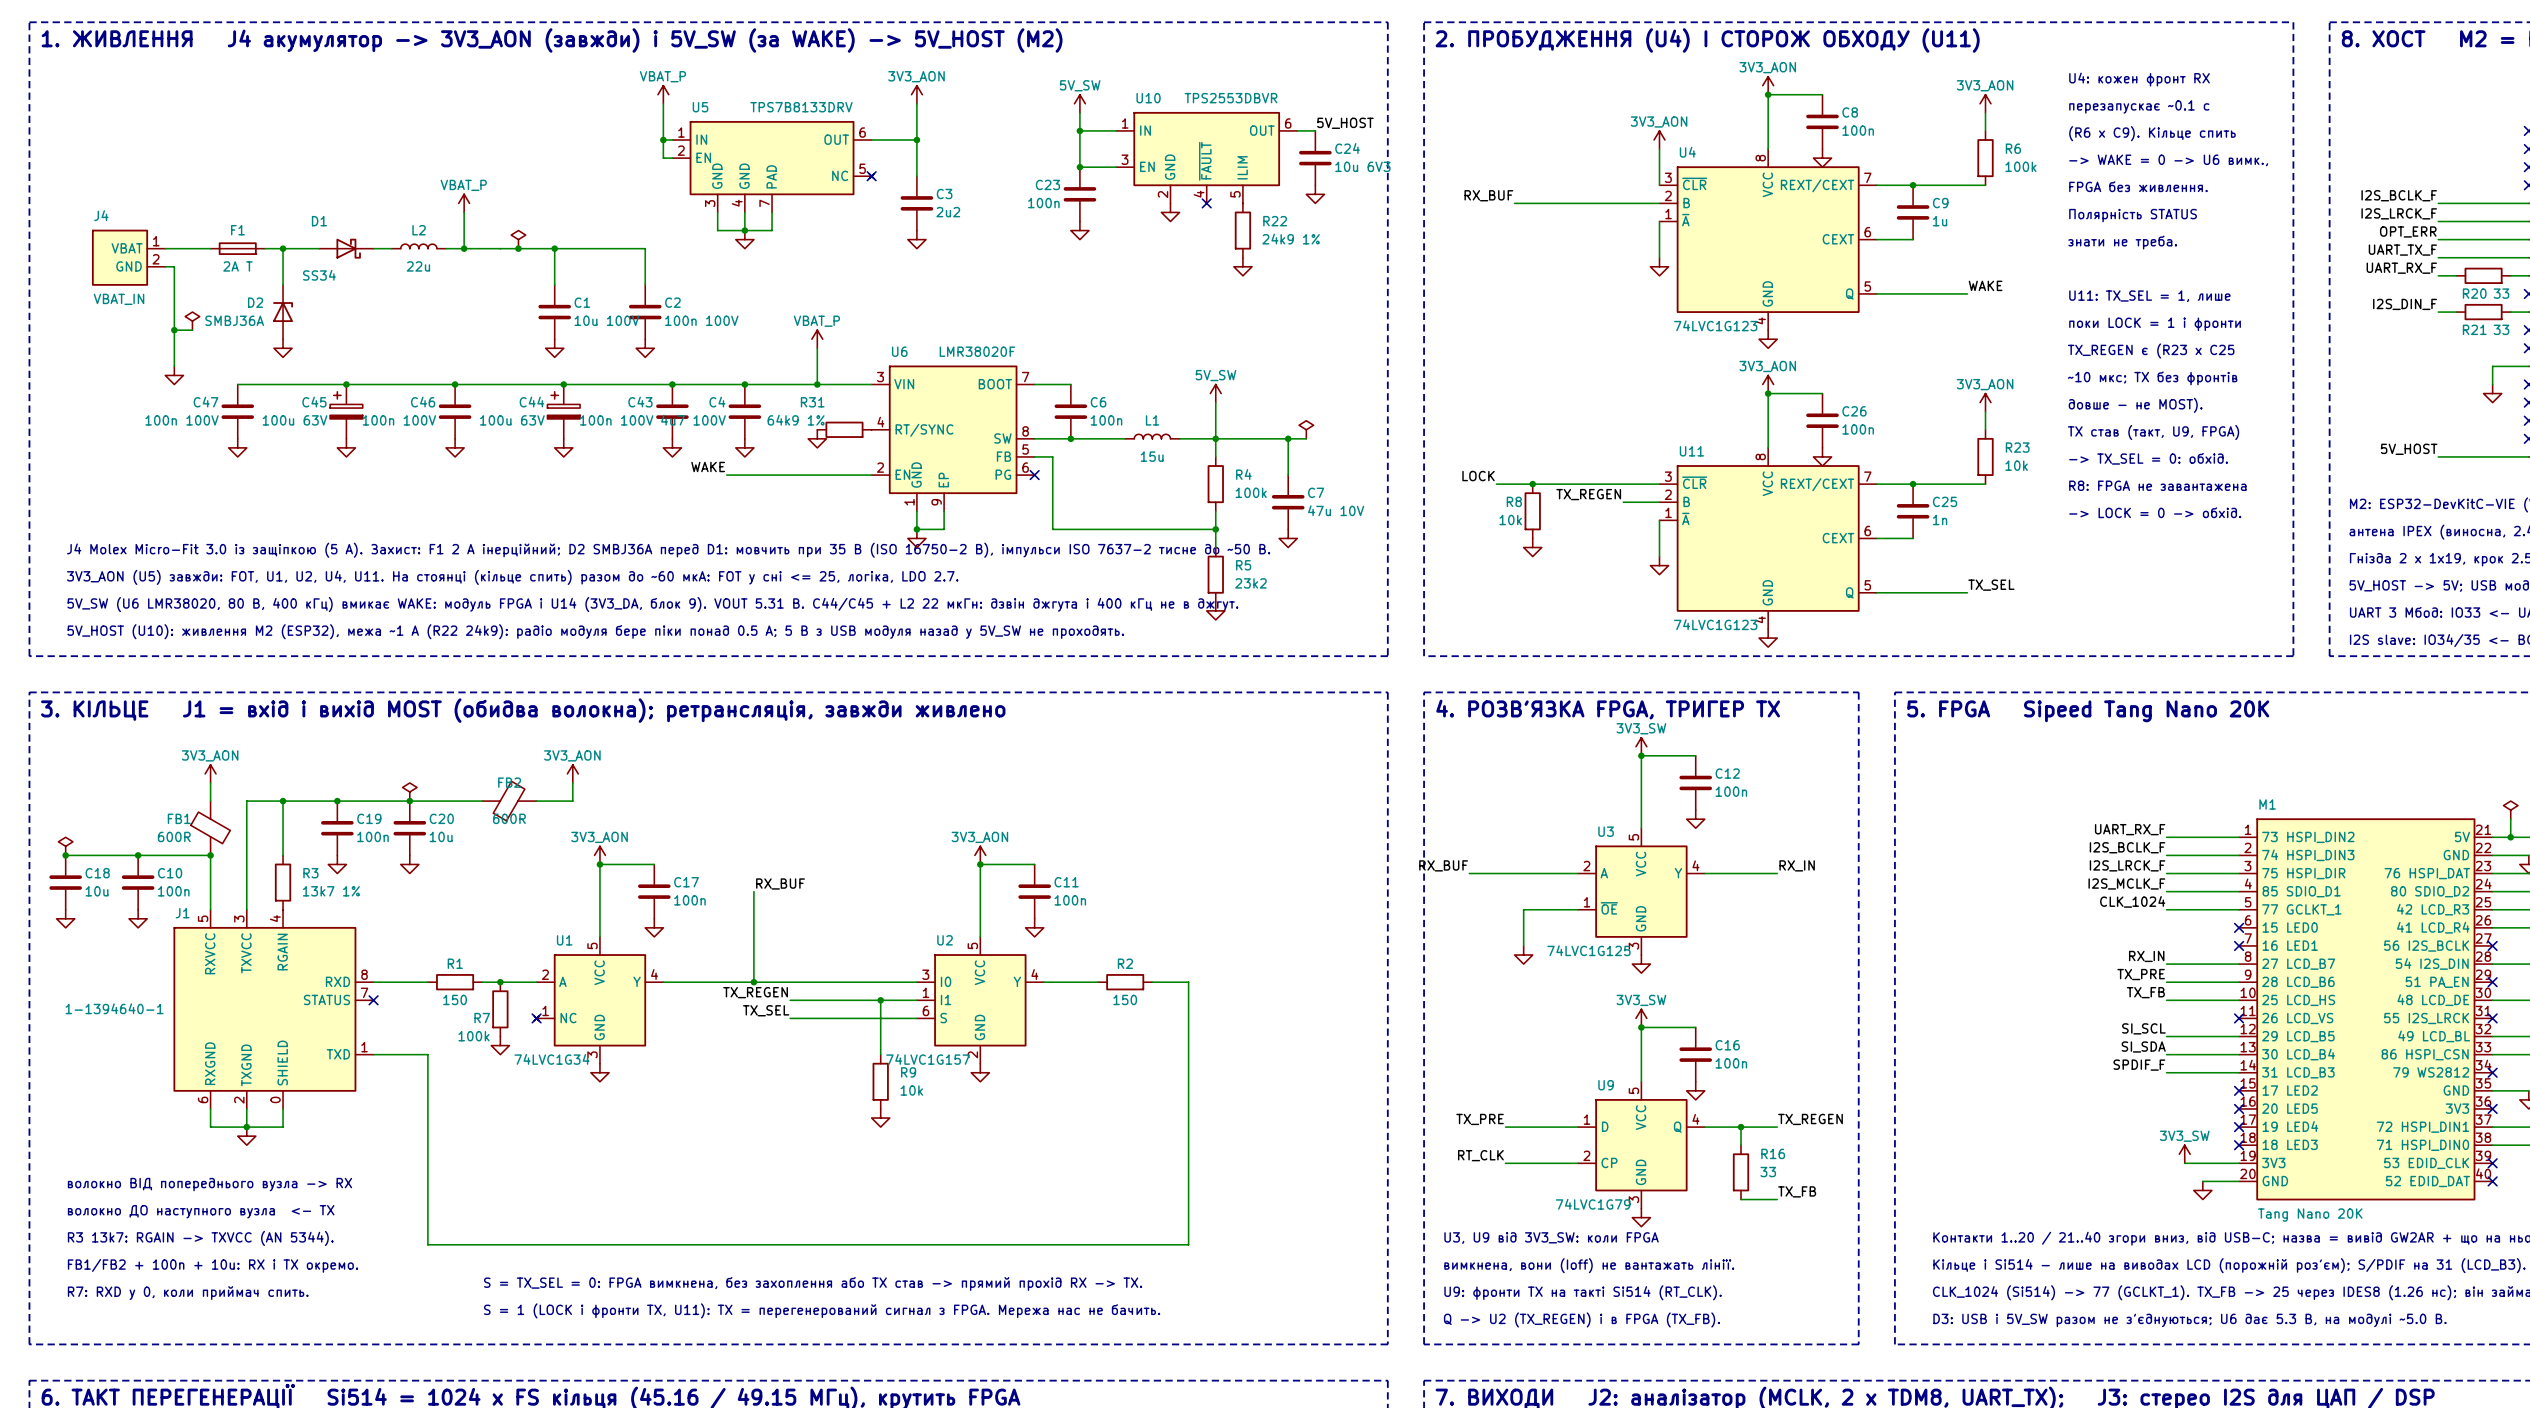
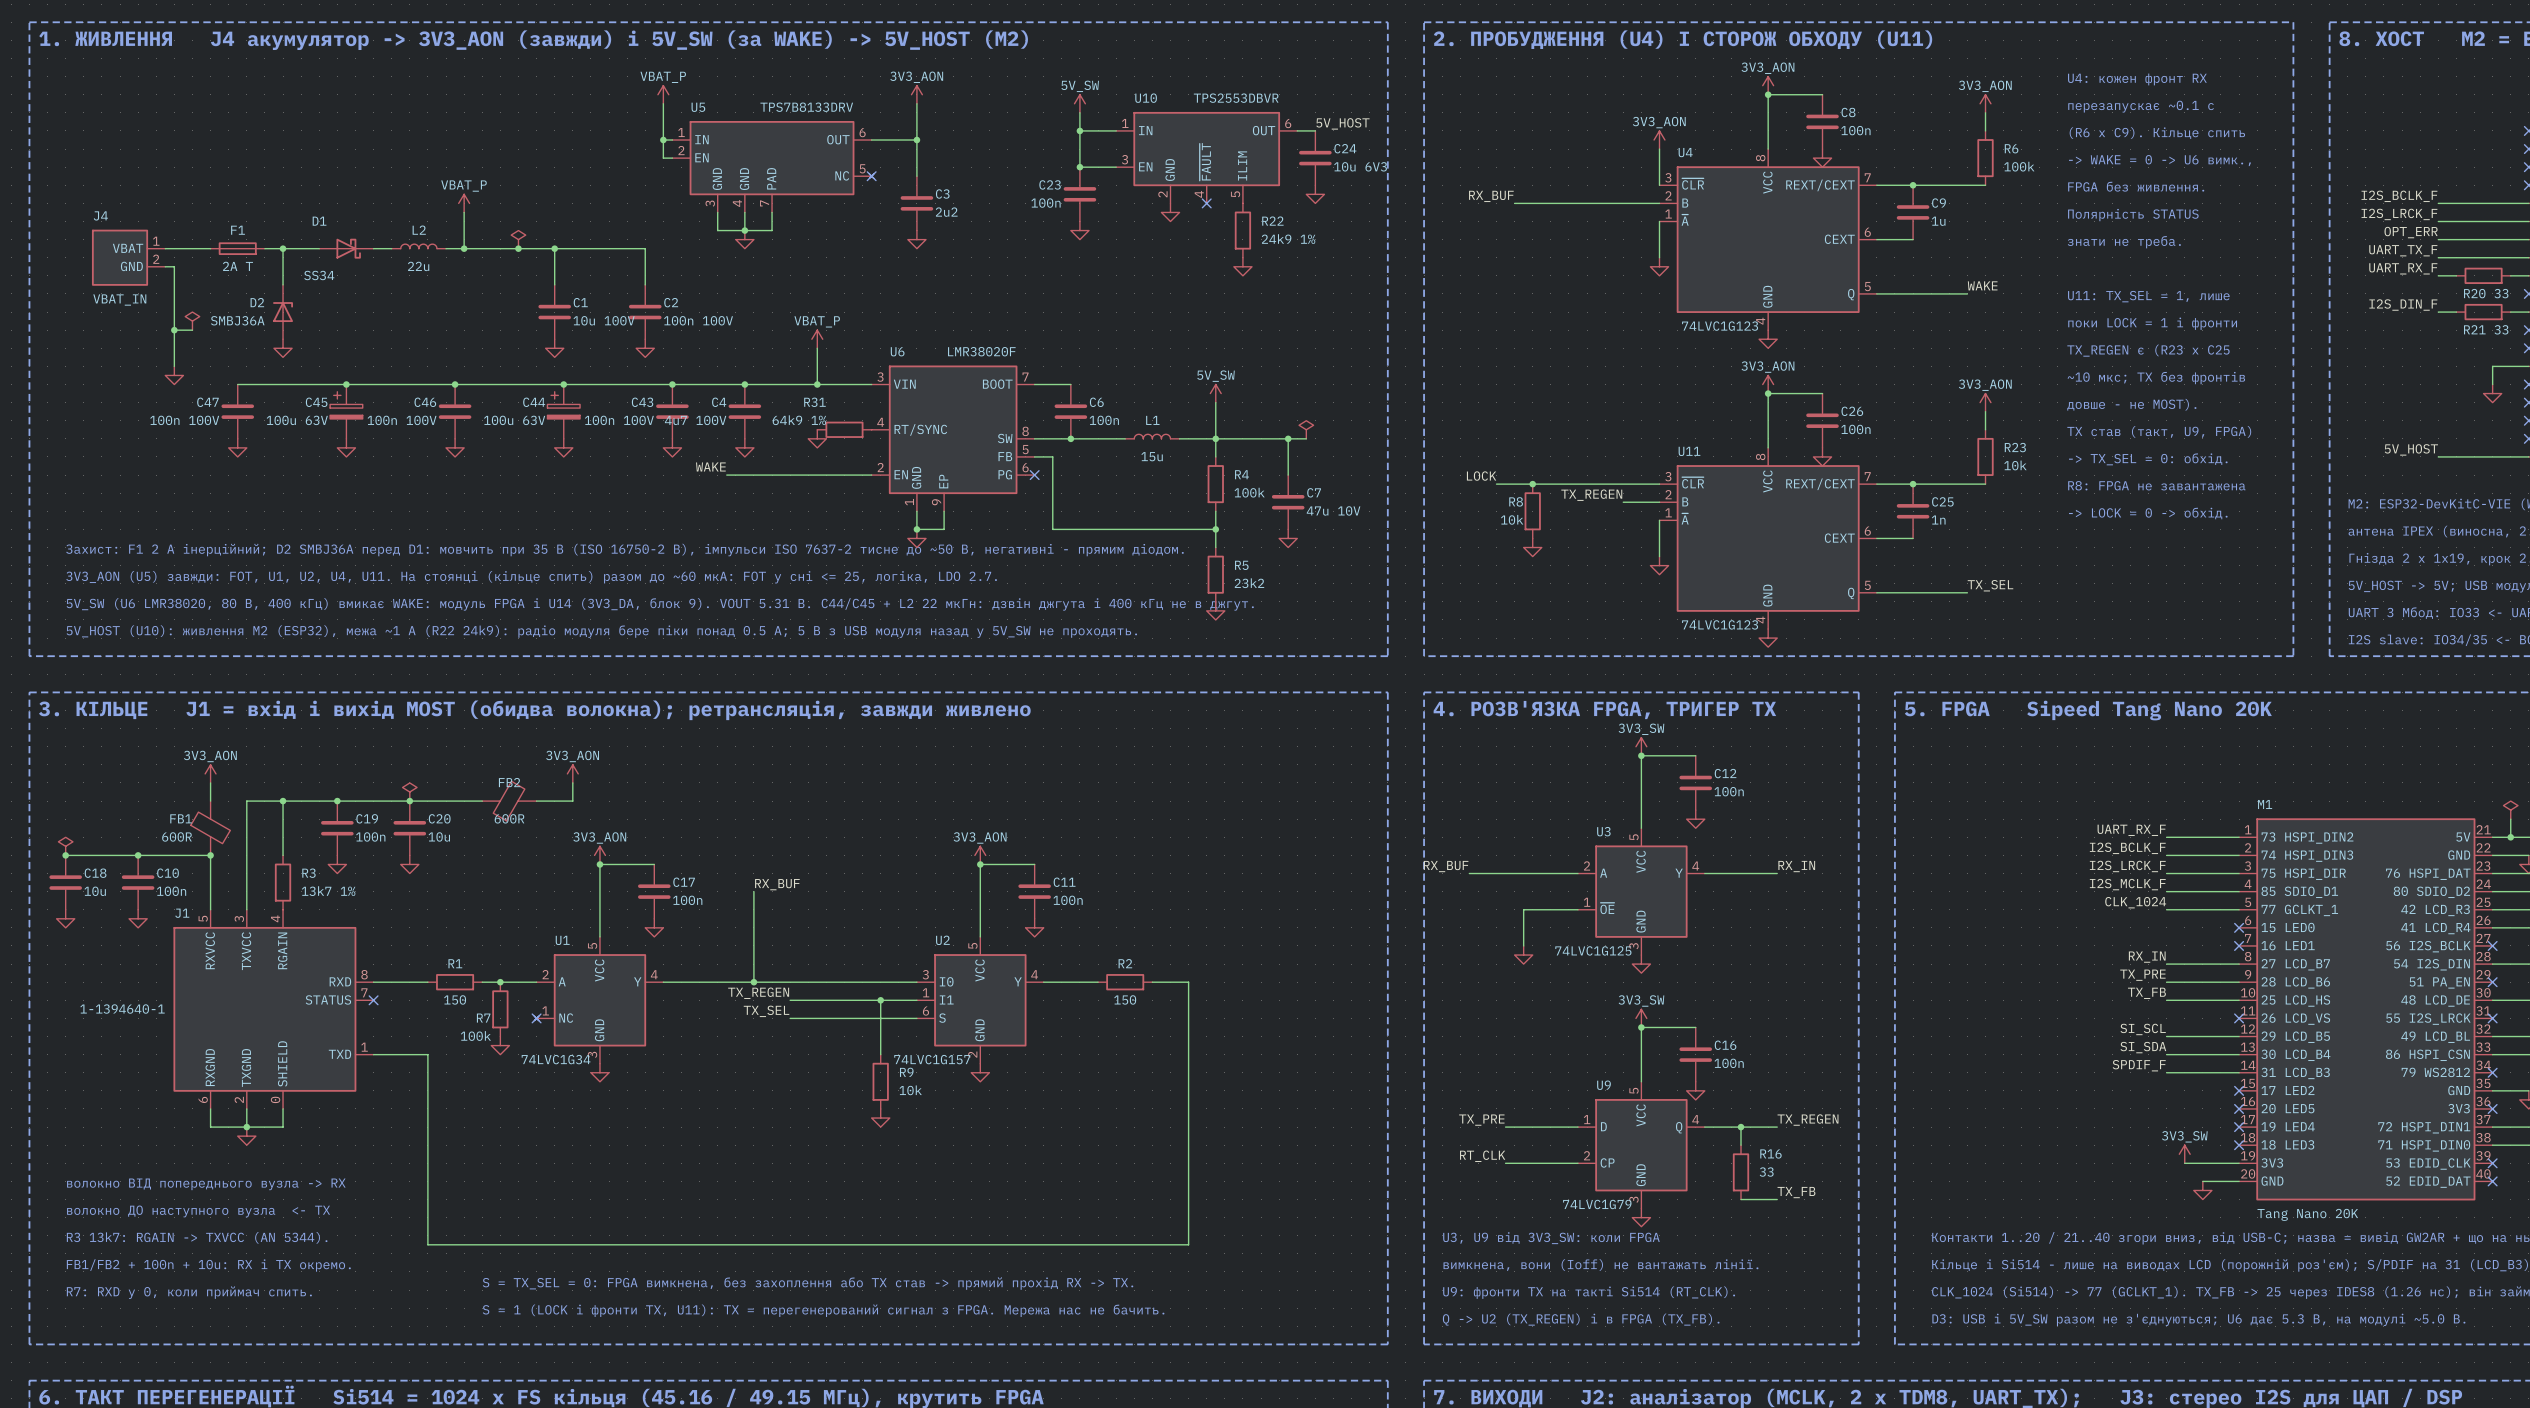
text: J4 Molex Micro-Fit 3.0 із защіпкою (5 А). Захист: F1 2 А інерційний; D2 SMBJ36A перед D1: мовчить при 35 В (ISO 16750-2 B), імпульси ISO 7637-2 тисне до ~50 В. (668, 550) -> Захист: F1 2 А інерційний; D2 SMBJ36A перед D1: мовчить при 35 В (ISO 16750-2 B), імпульси ISO 7637-2 тисне до ~50 В, негативні - прямим діодом. (624, 549)

